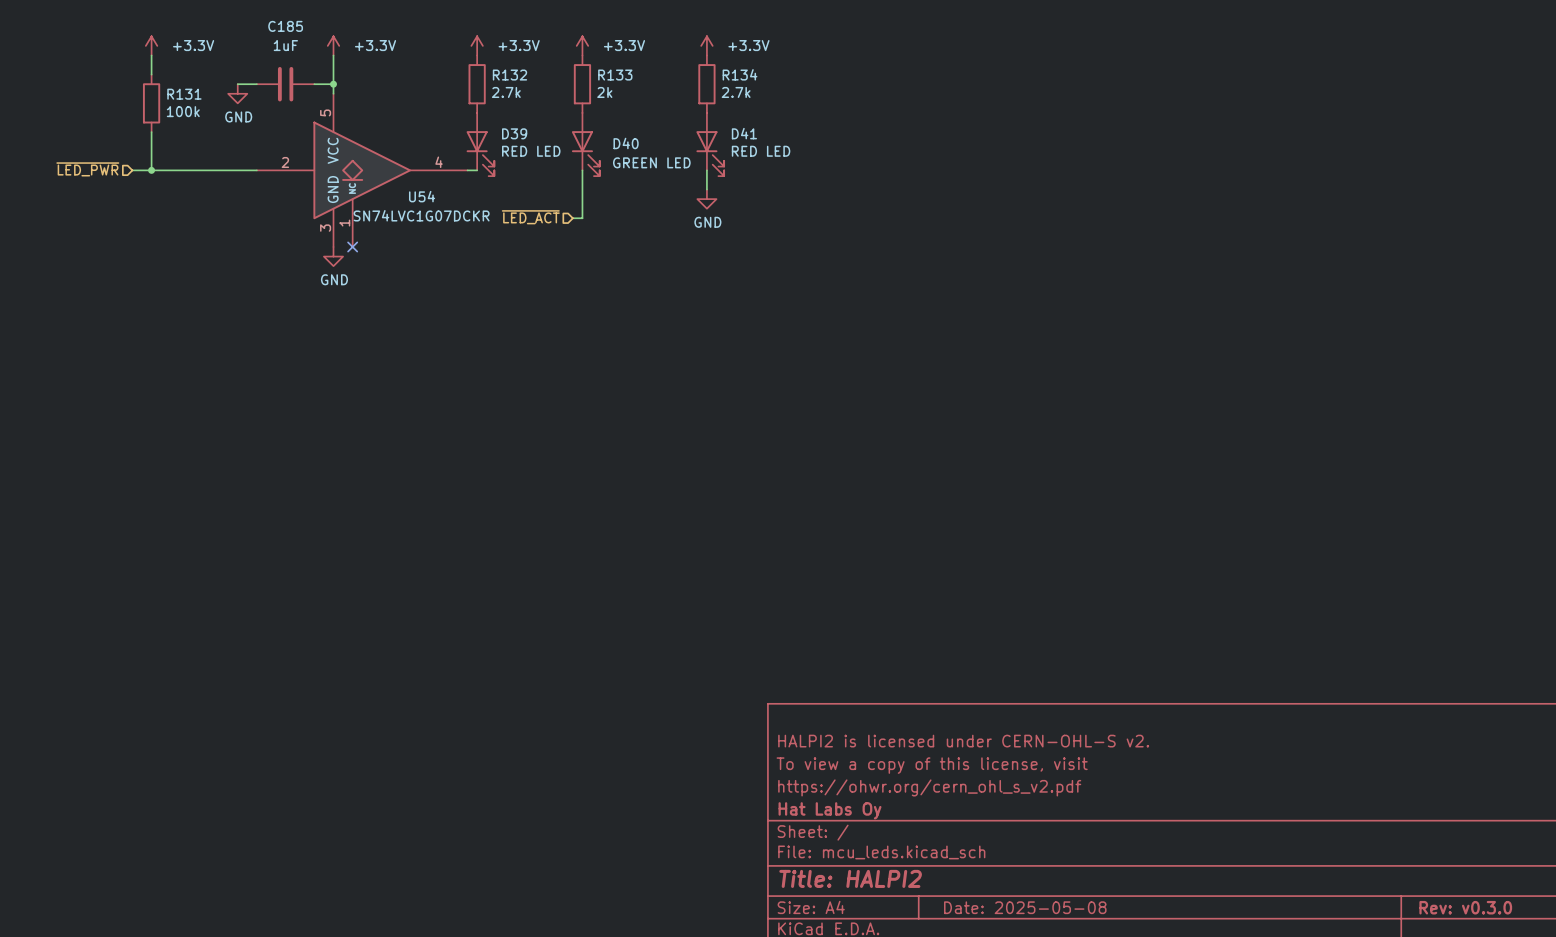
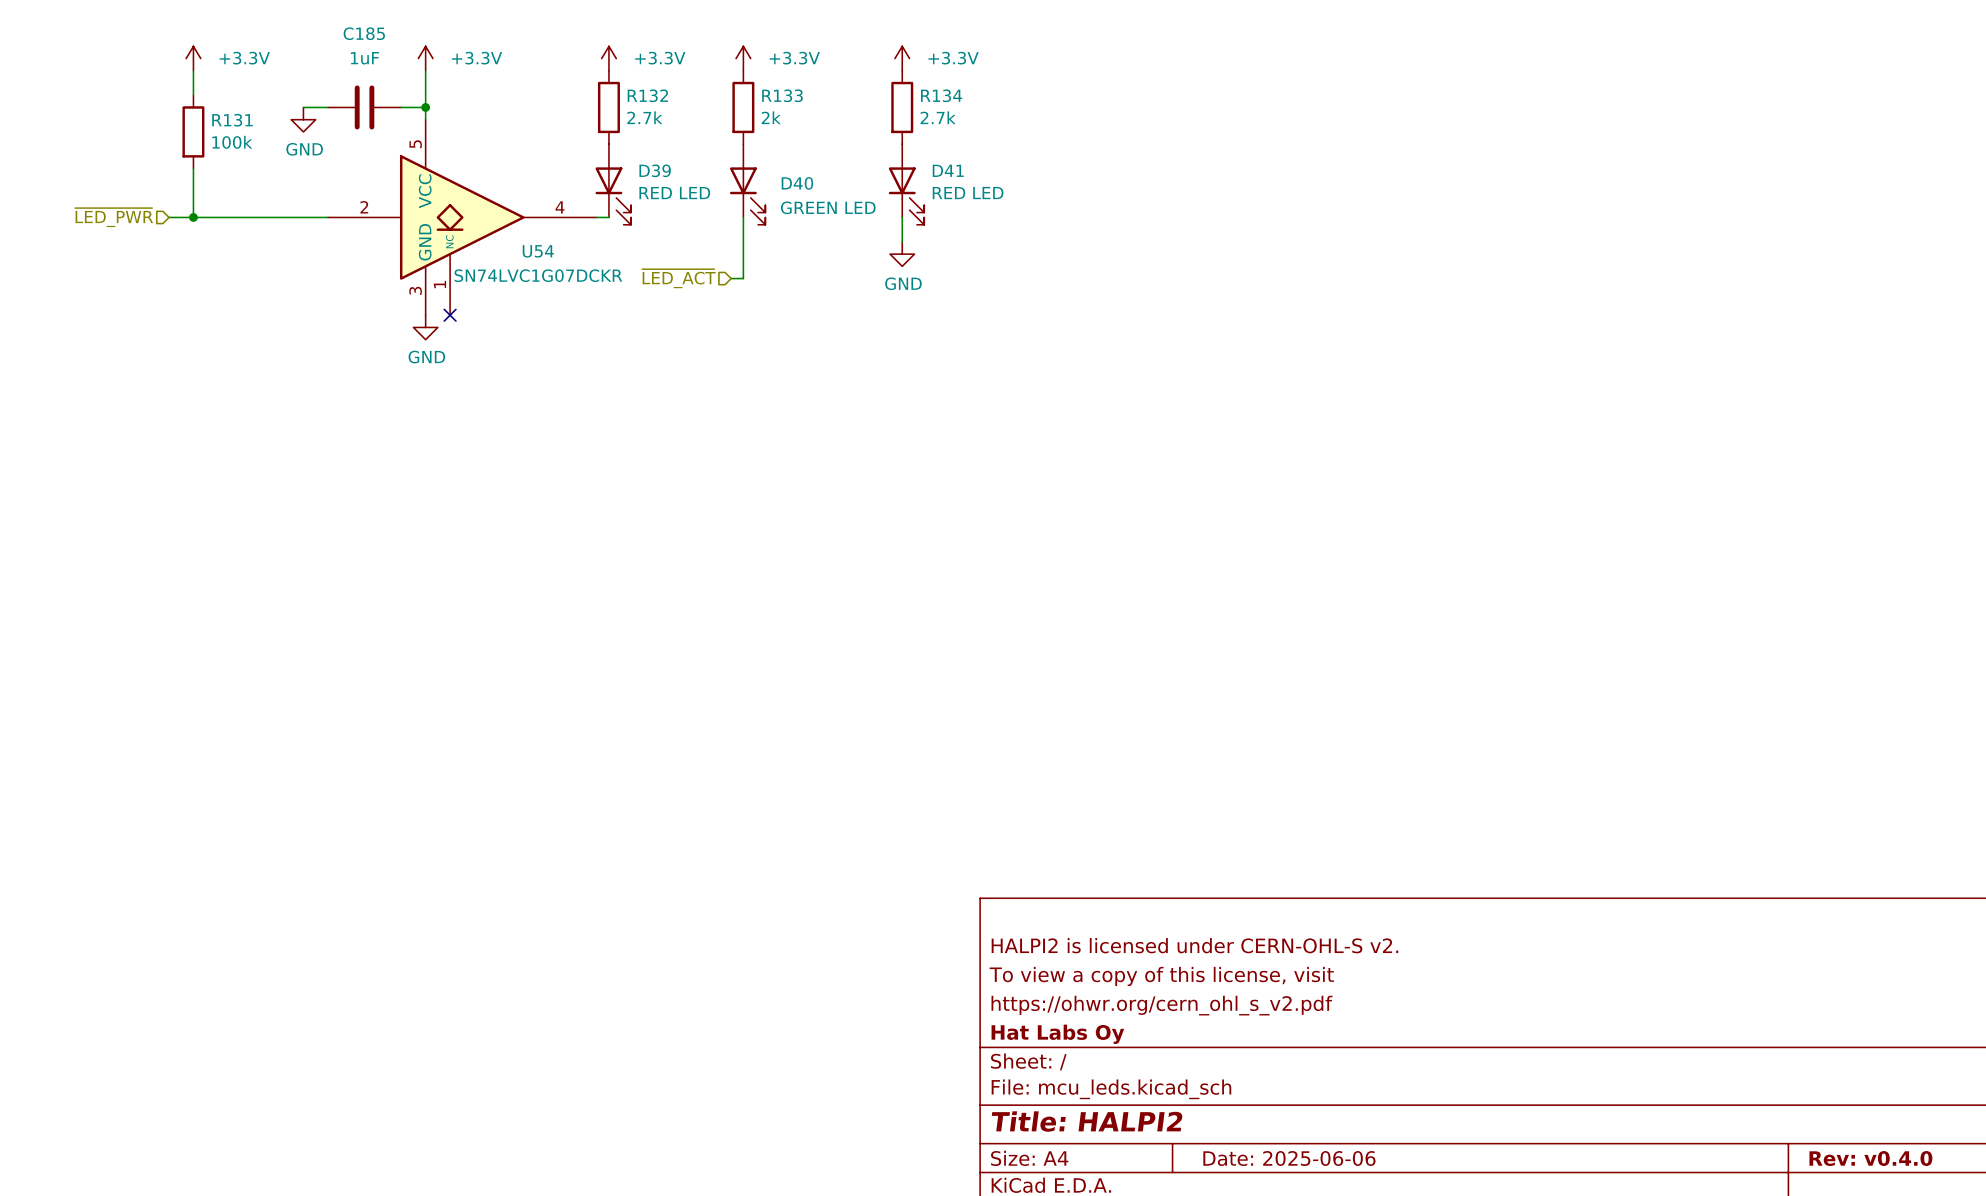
title block: Date: 2025-05-08 (1025, 907) -> Date: 2025-06-06 (1289, 1158)
title block: Rev: v0.3.0 (1465, 907) -> Rev: v0.4.0 (1870, 1158)

